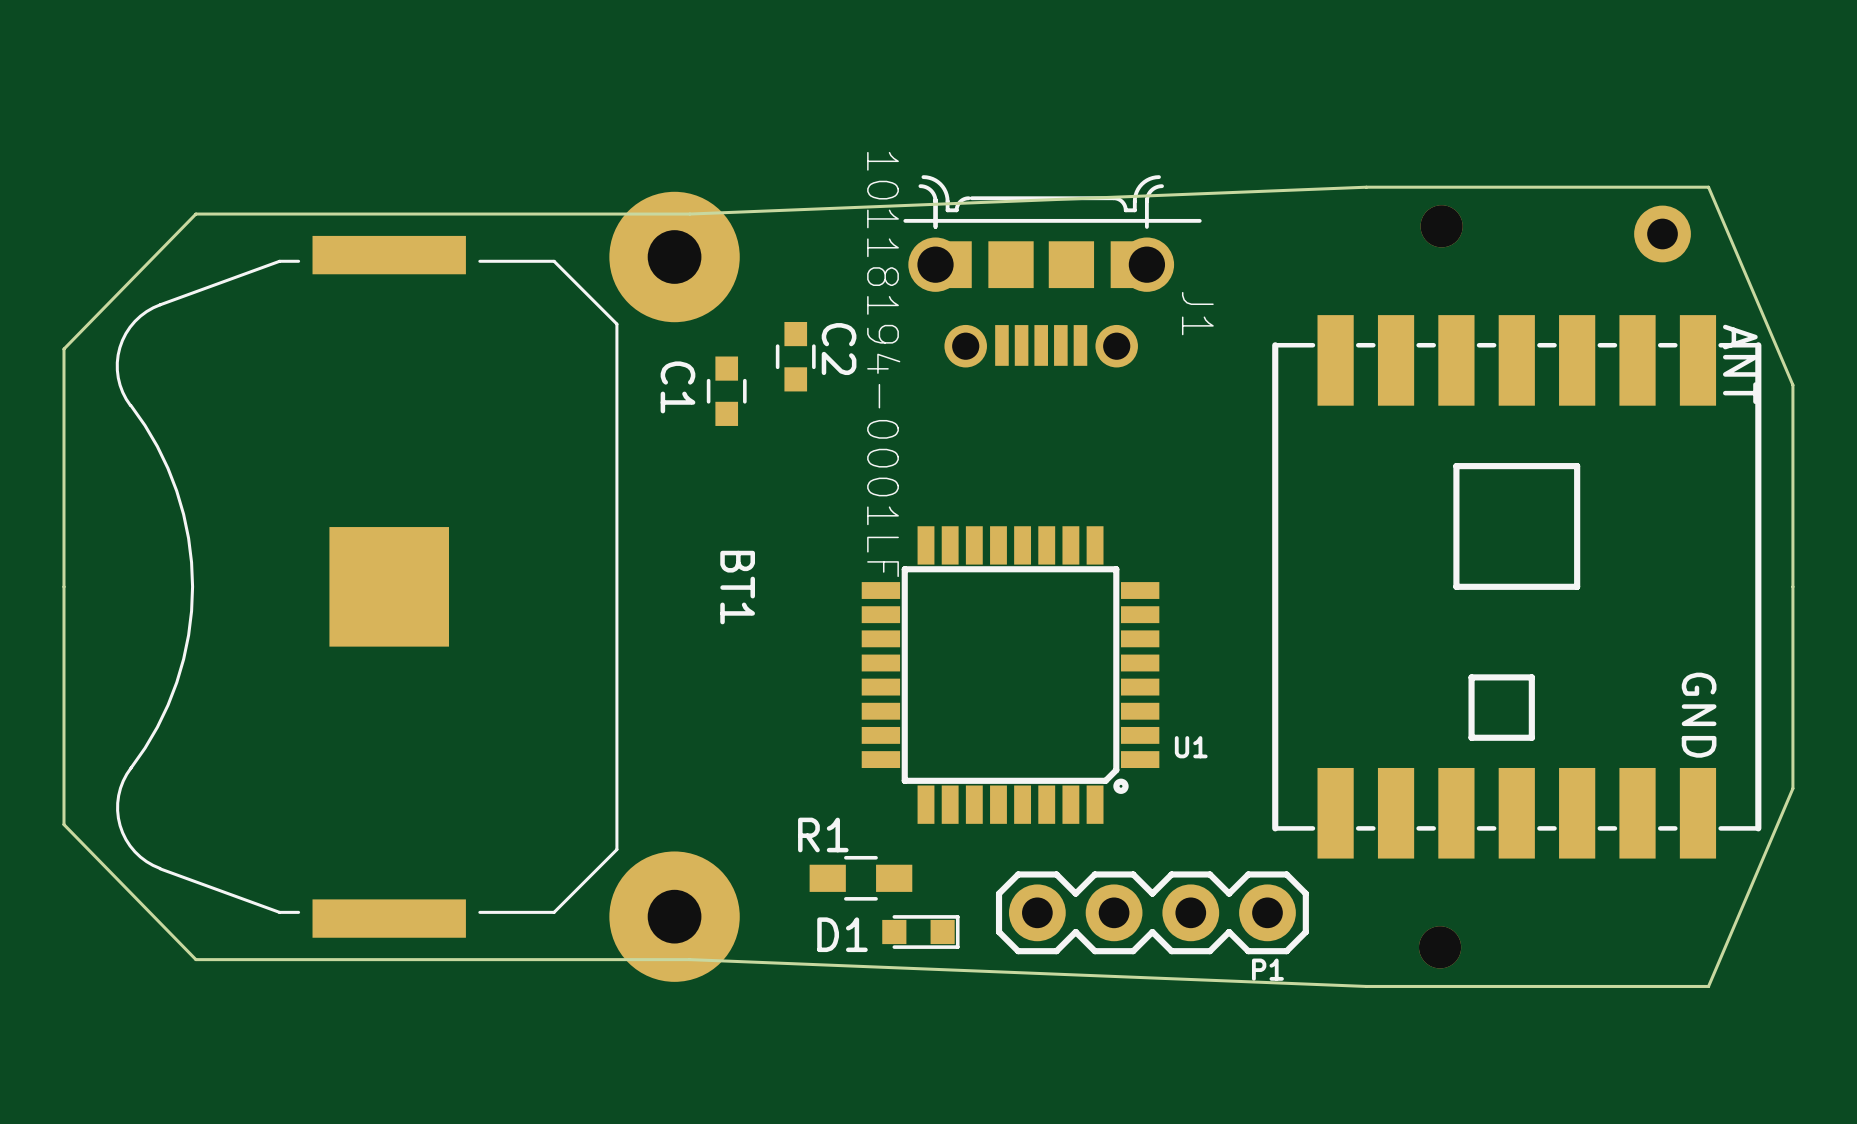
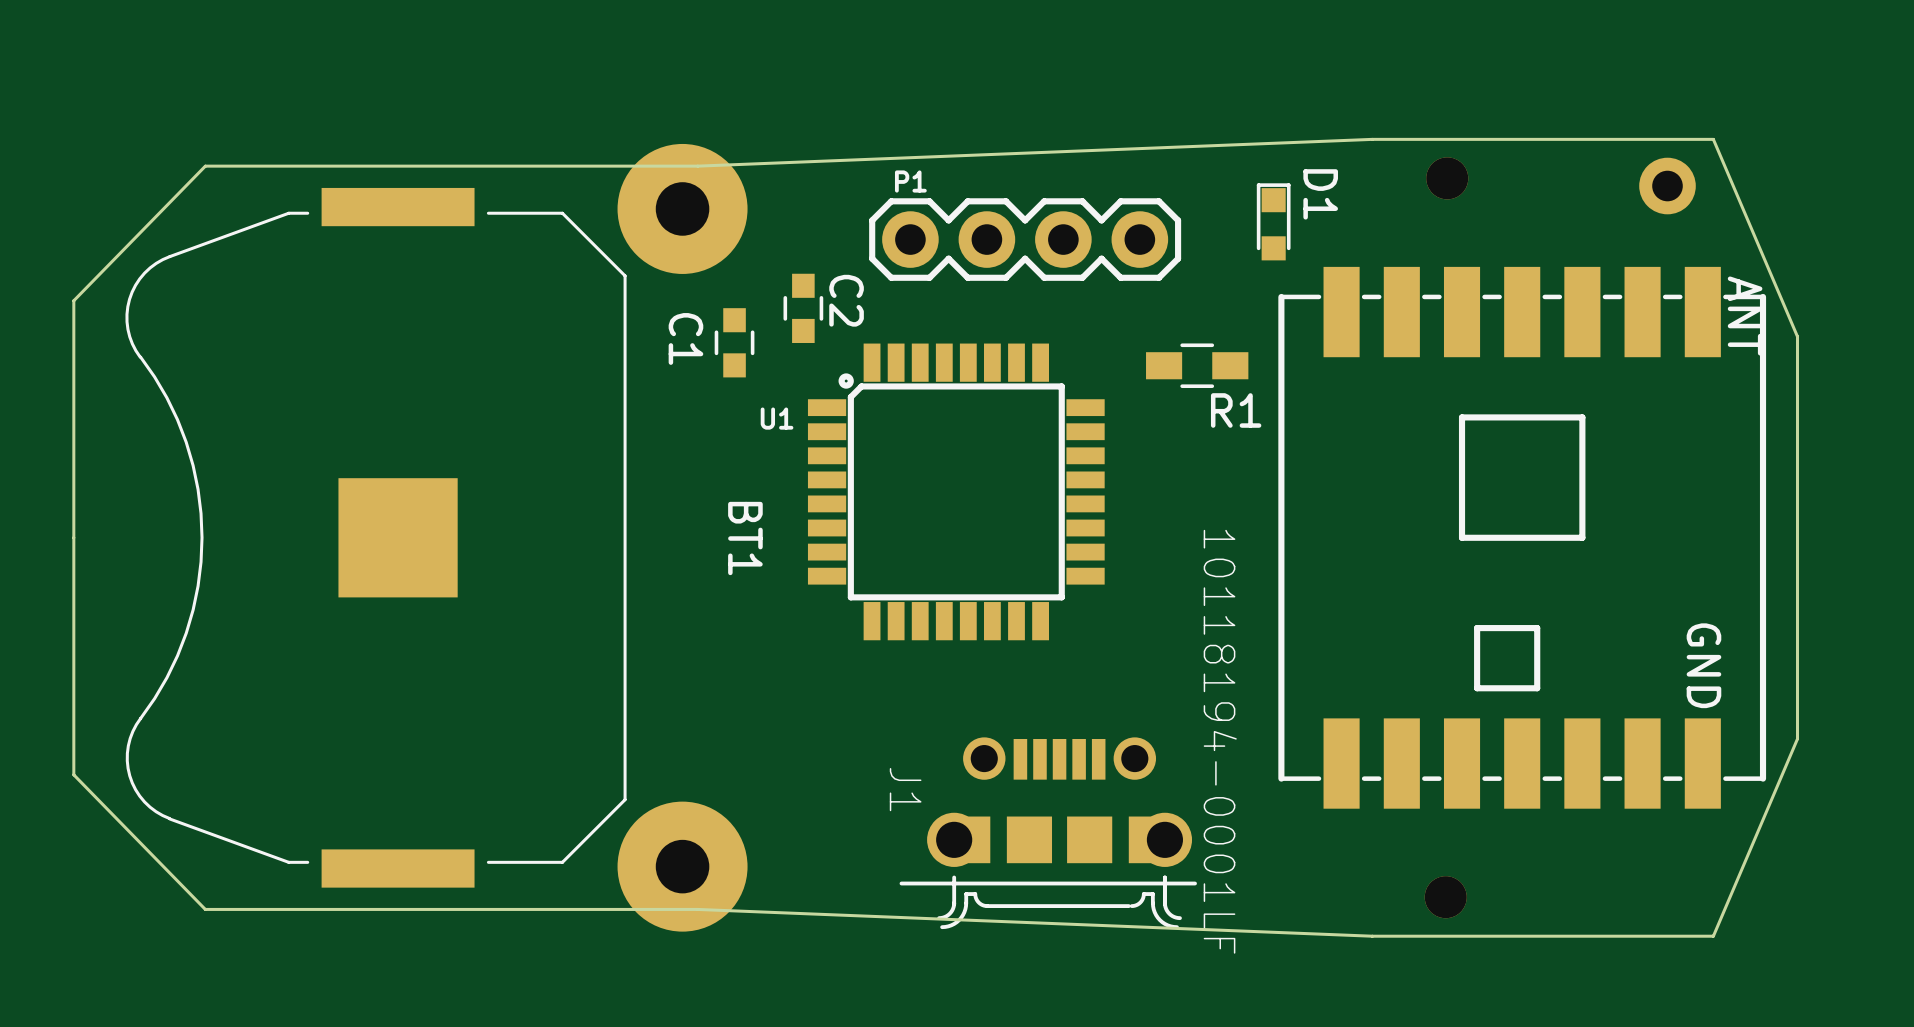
J1 rotation: 0° (1052, 271) -> 180° (1048, 833)
J1 position: (1052, 271) -> (1048, 833)
U1 rotation: 0° (1010, 675) -> 180° (956, 491)
R1 name position: R1 (823, 834) -> R1 (1236, 410)
R1 position: (860, 878) -> (1197, 365)
P1 position: (1152, 912) -> (1025, 239)
D1 rotation: 0° (920, 932) -> 90° counterclockwise (1273, 221)
D1 position: (920, 932) -> (1273, 221)
D1 name position: D1 (842, 934) -> D1 (1320, 194)
P1 name position: P1 (1267, 969) -> P1 (910, 181)

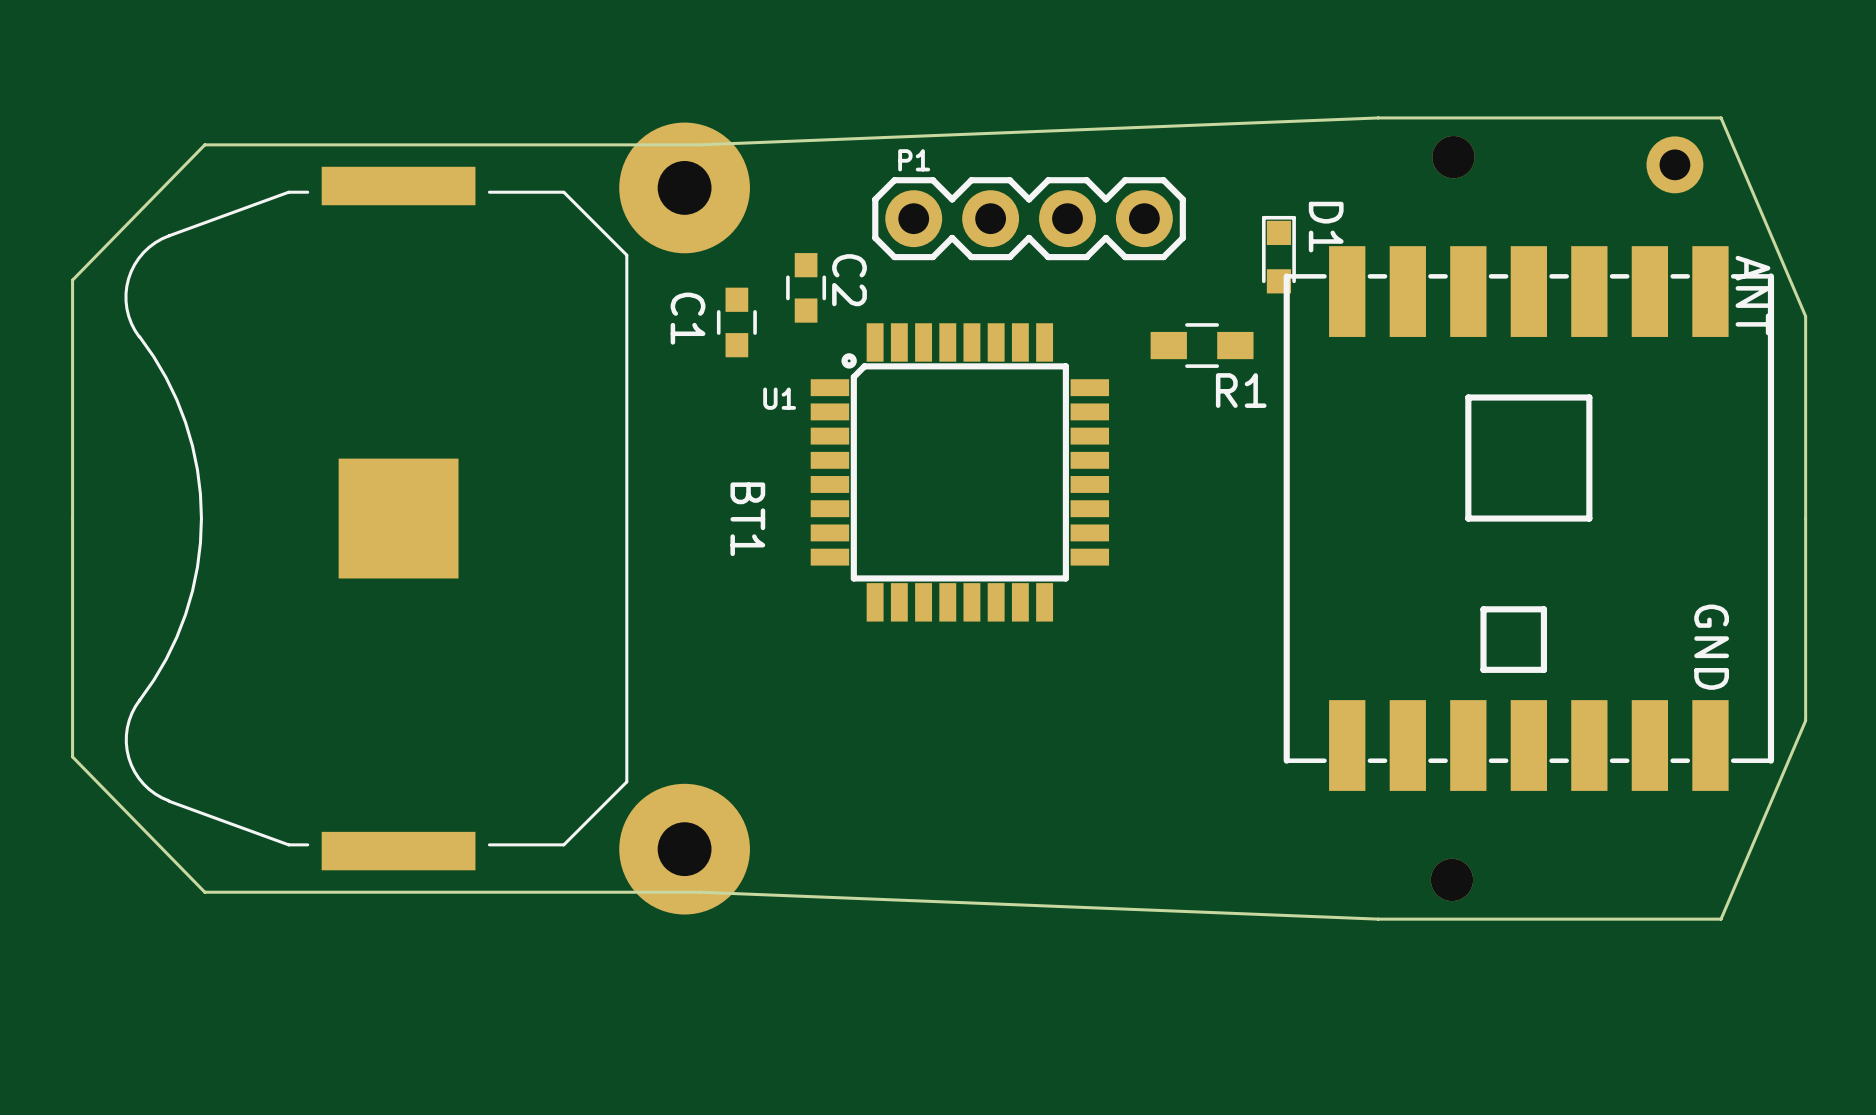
D1 position: (1273, 221) -> (1278, 254)
J1: 10118194-0001LF (1048, 833) -> none

